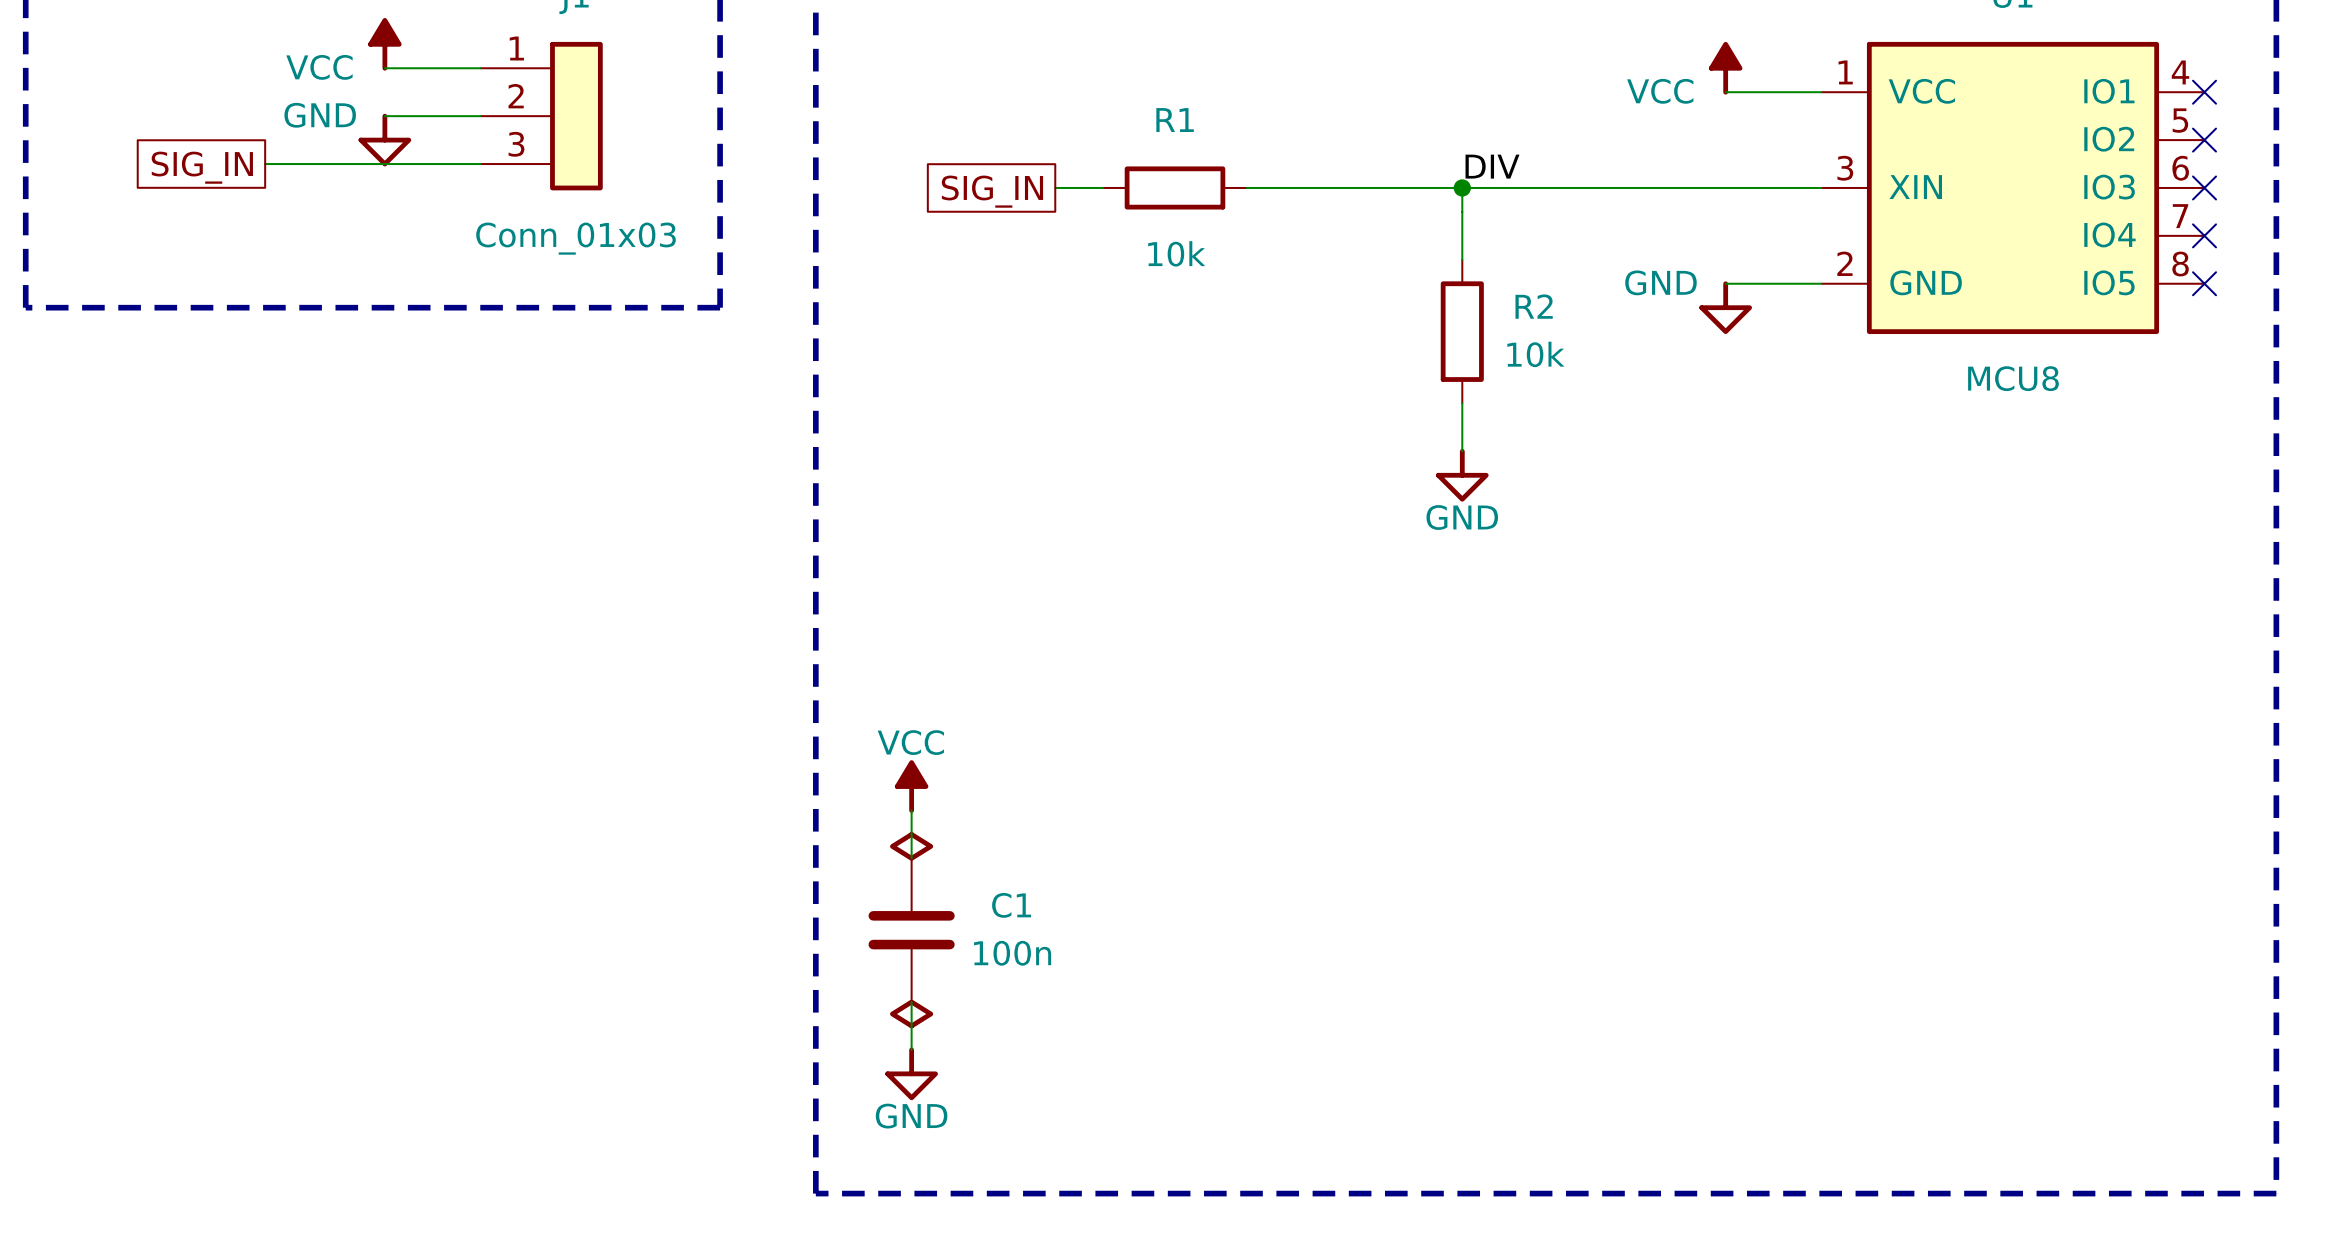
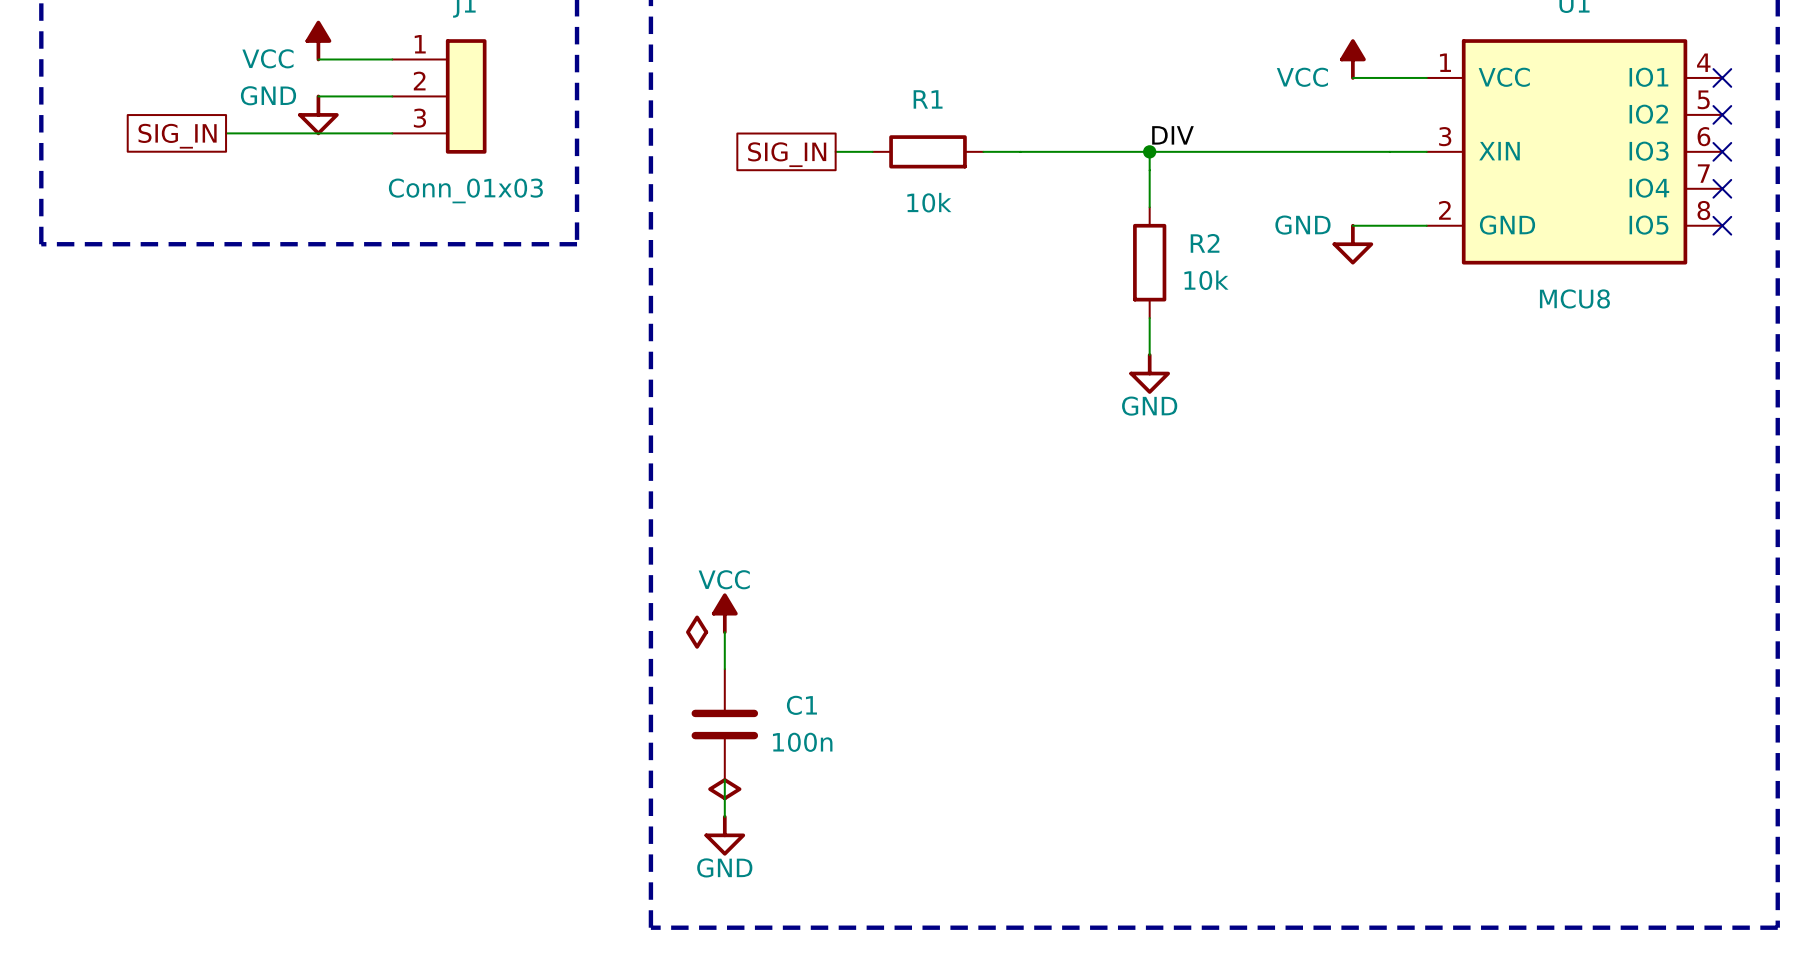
power symbol rotation: 0° (911, 846) -> 90° clockwise (697, 632)
power symbol position: (911, 846) -> (697, 632)

